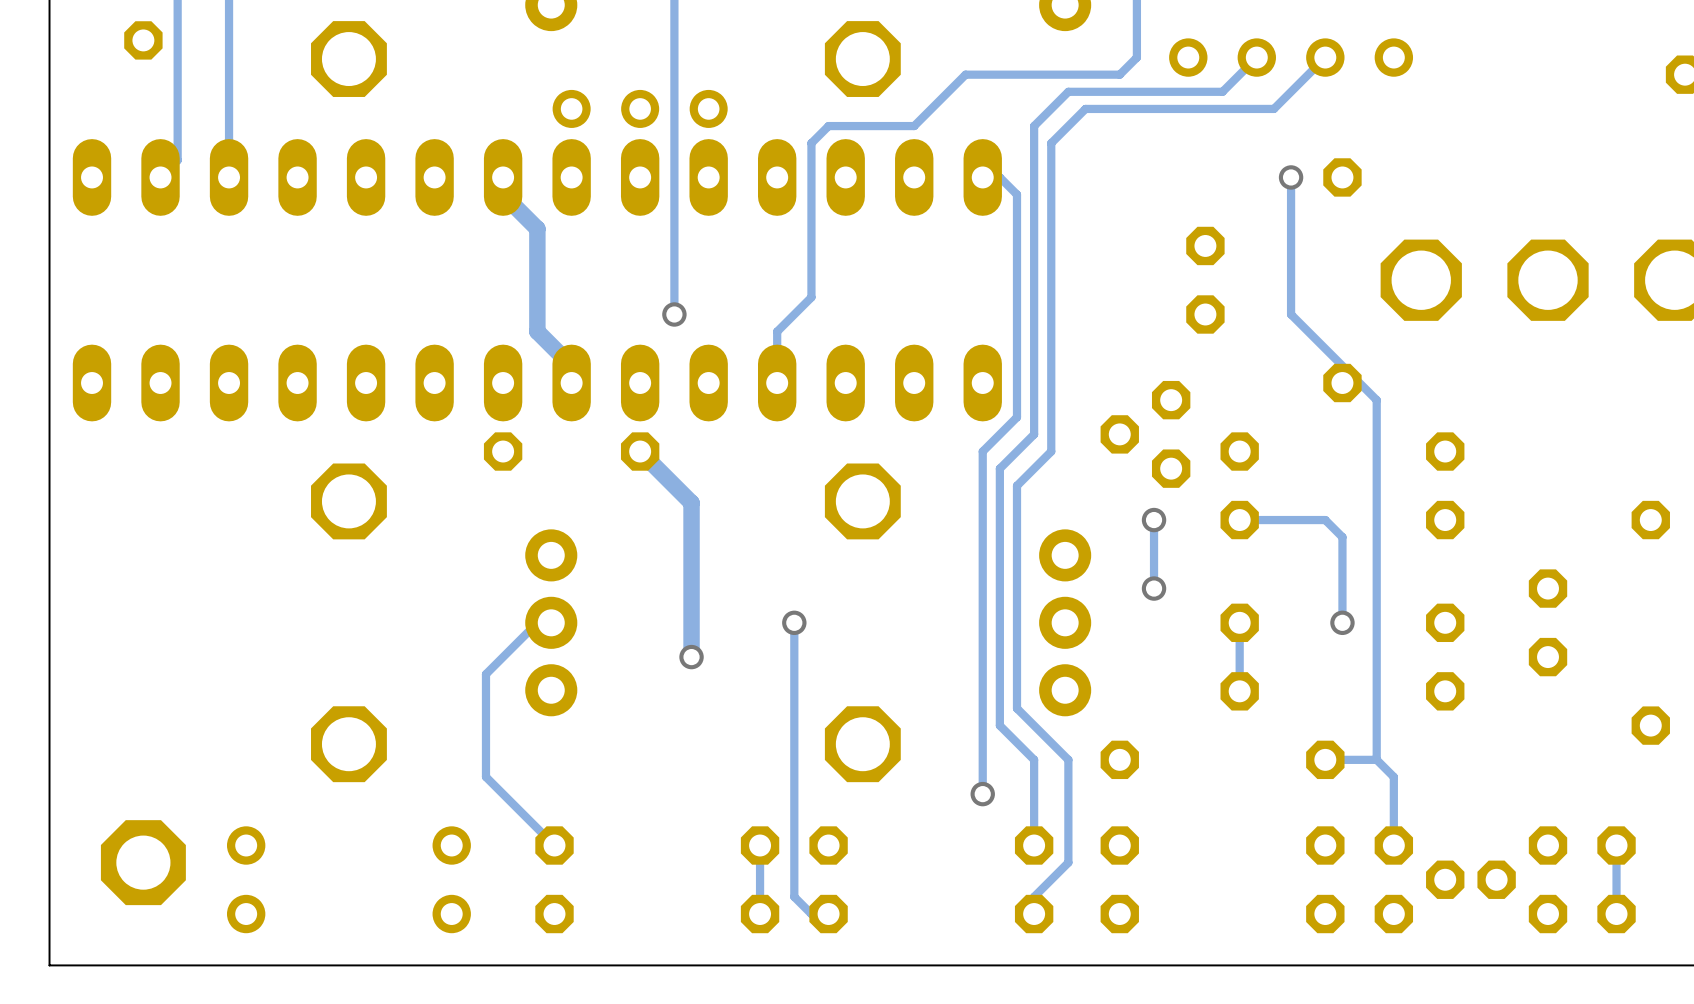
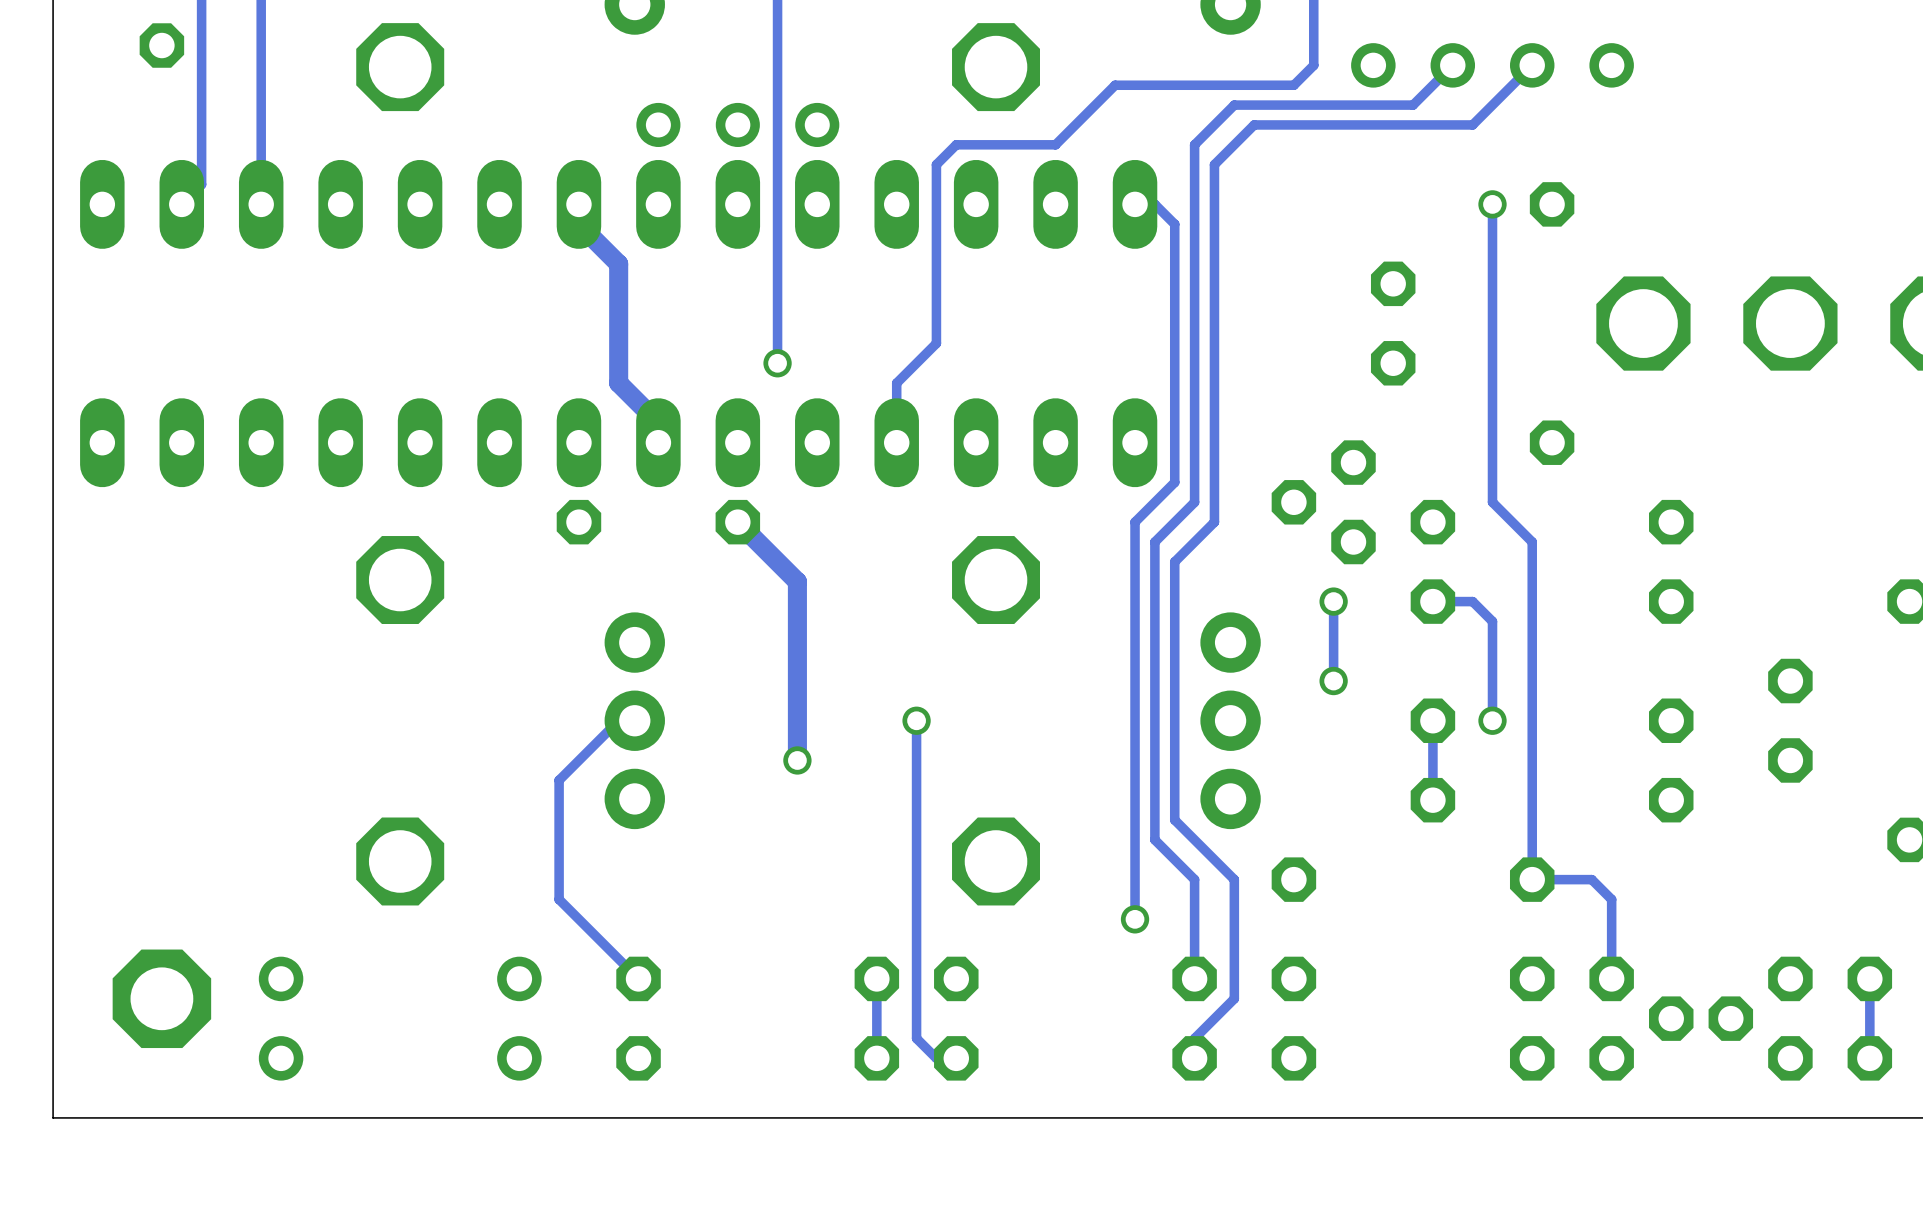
track: (1291, 314) (1376, 400) (1376, 759) -> (1492, 363) (1492, 502) (1532, 542) (1532, 879)
track: (1273, 520) (1325, 520) (1342, 537) (1342, 622) -> (1472, 601) (1492, 621) (1492, 720)
via position: (1342, 622) -> (1492, 720)

